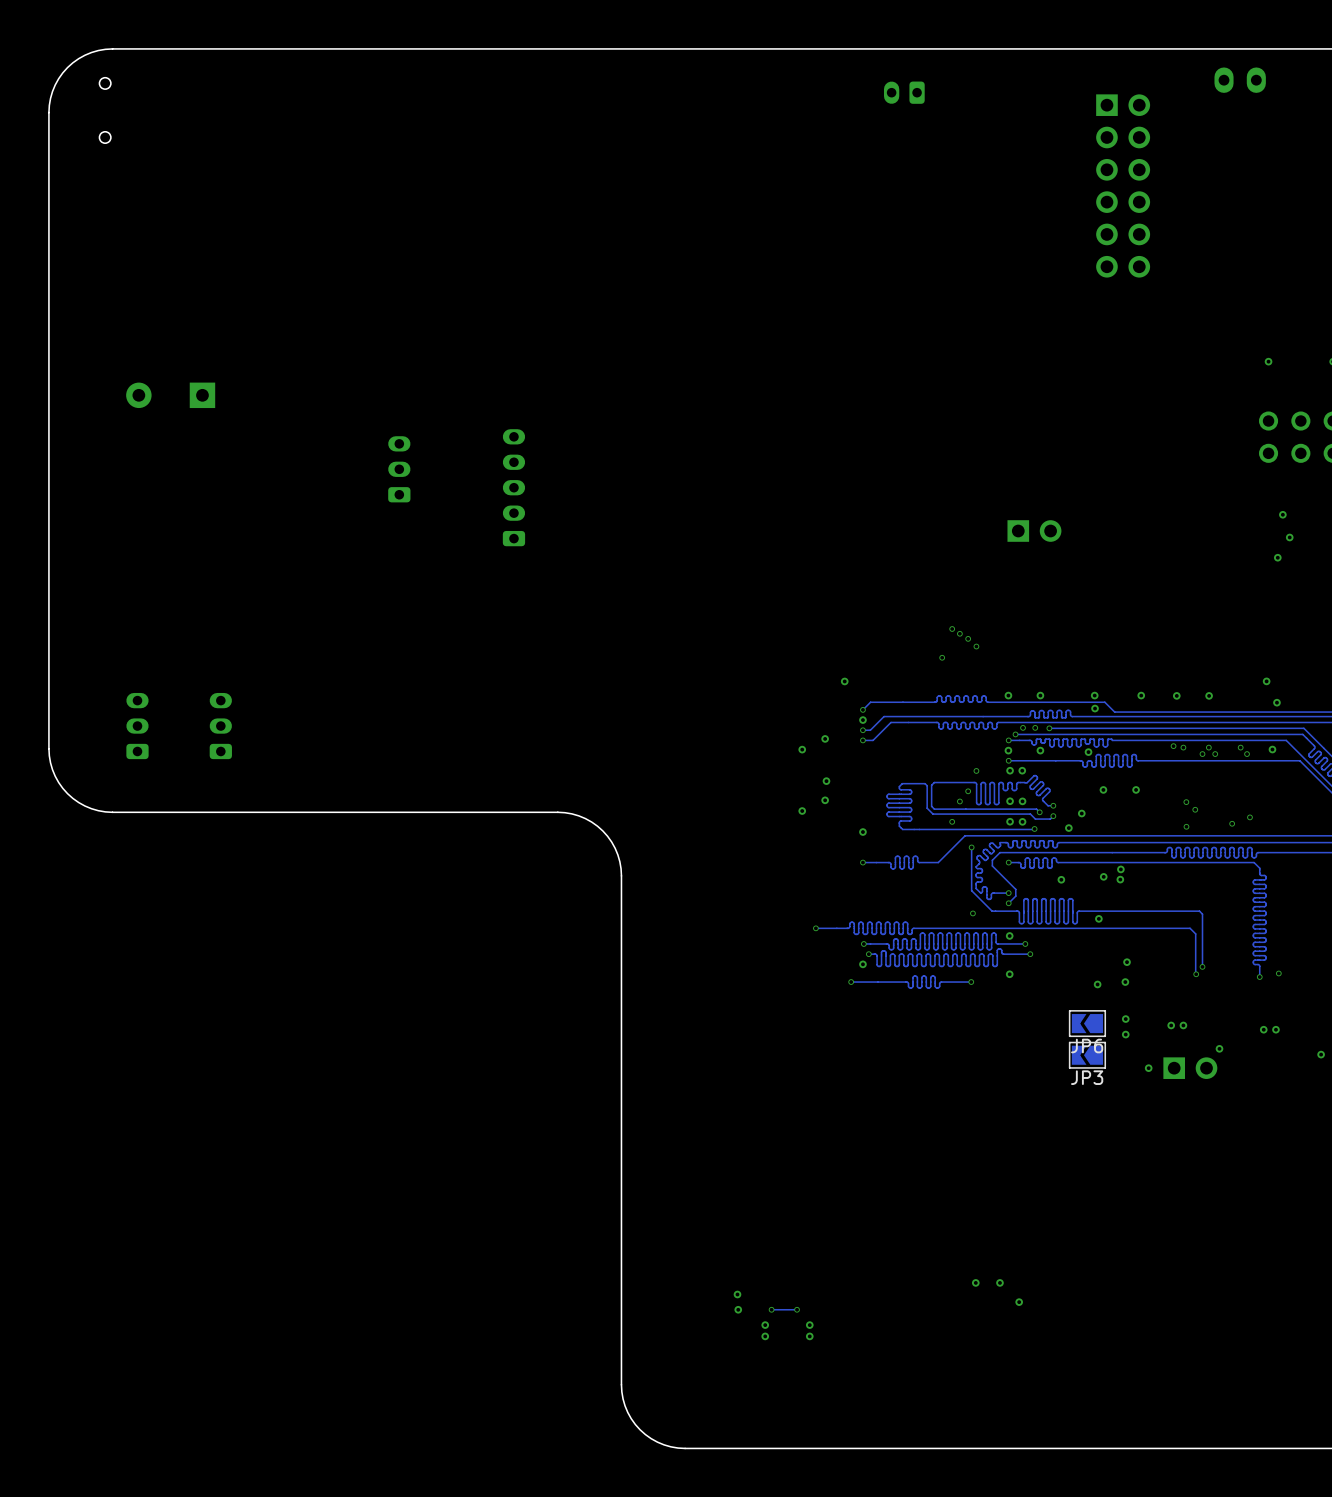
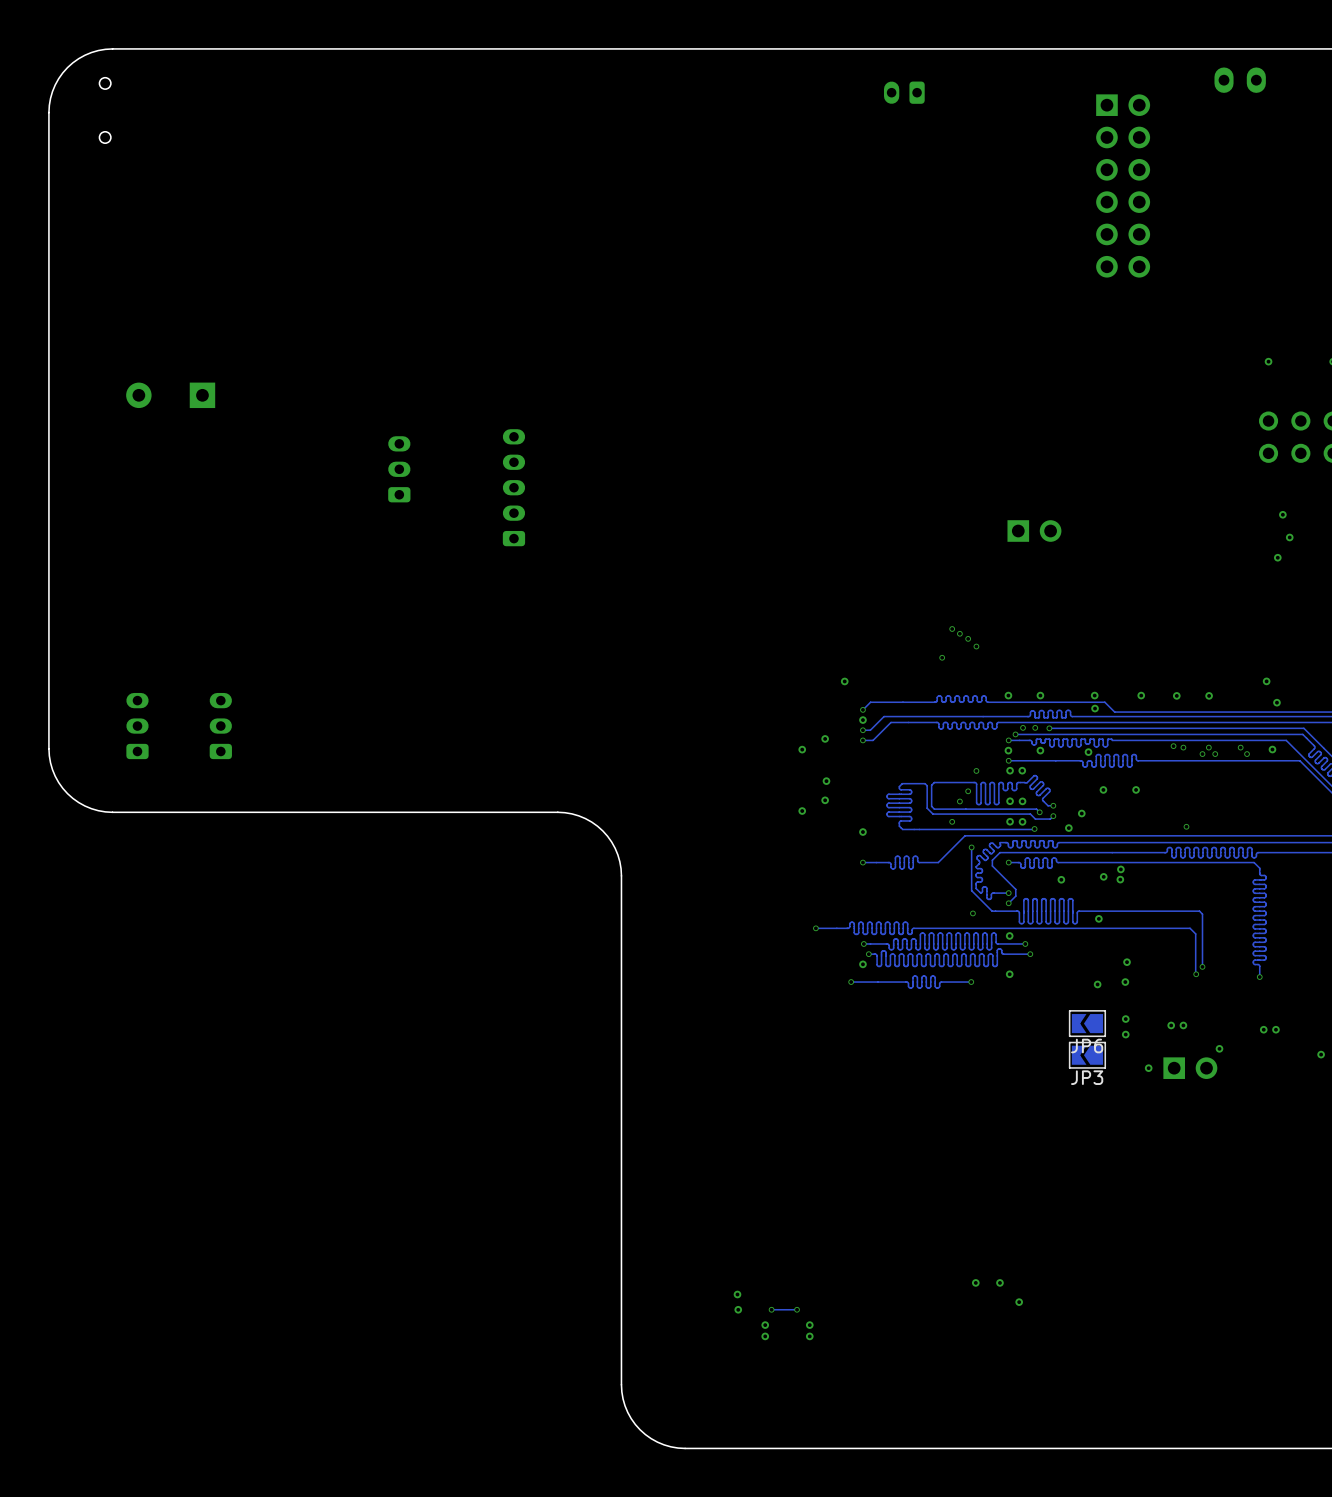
via: (1186, 802) -> none
via: (1195, 809) -> none
via: (1249, 817) -> none
via: (1232, 823) -> none
via: (1278, 973) -> none

